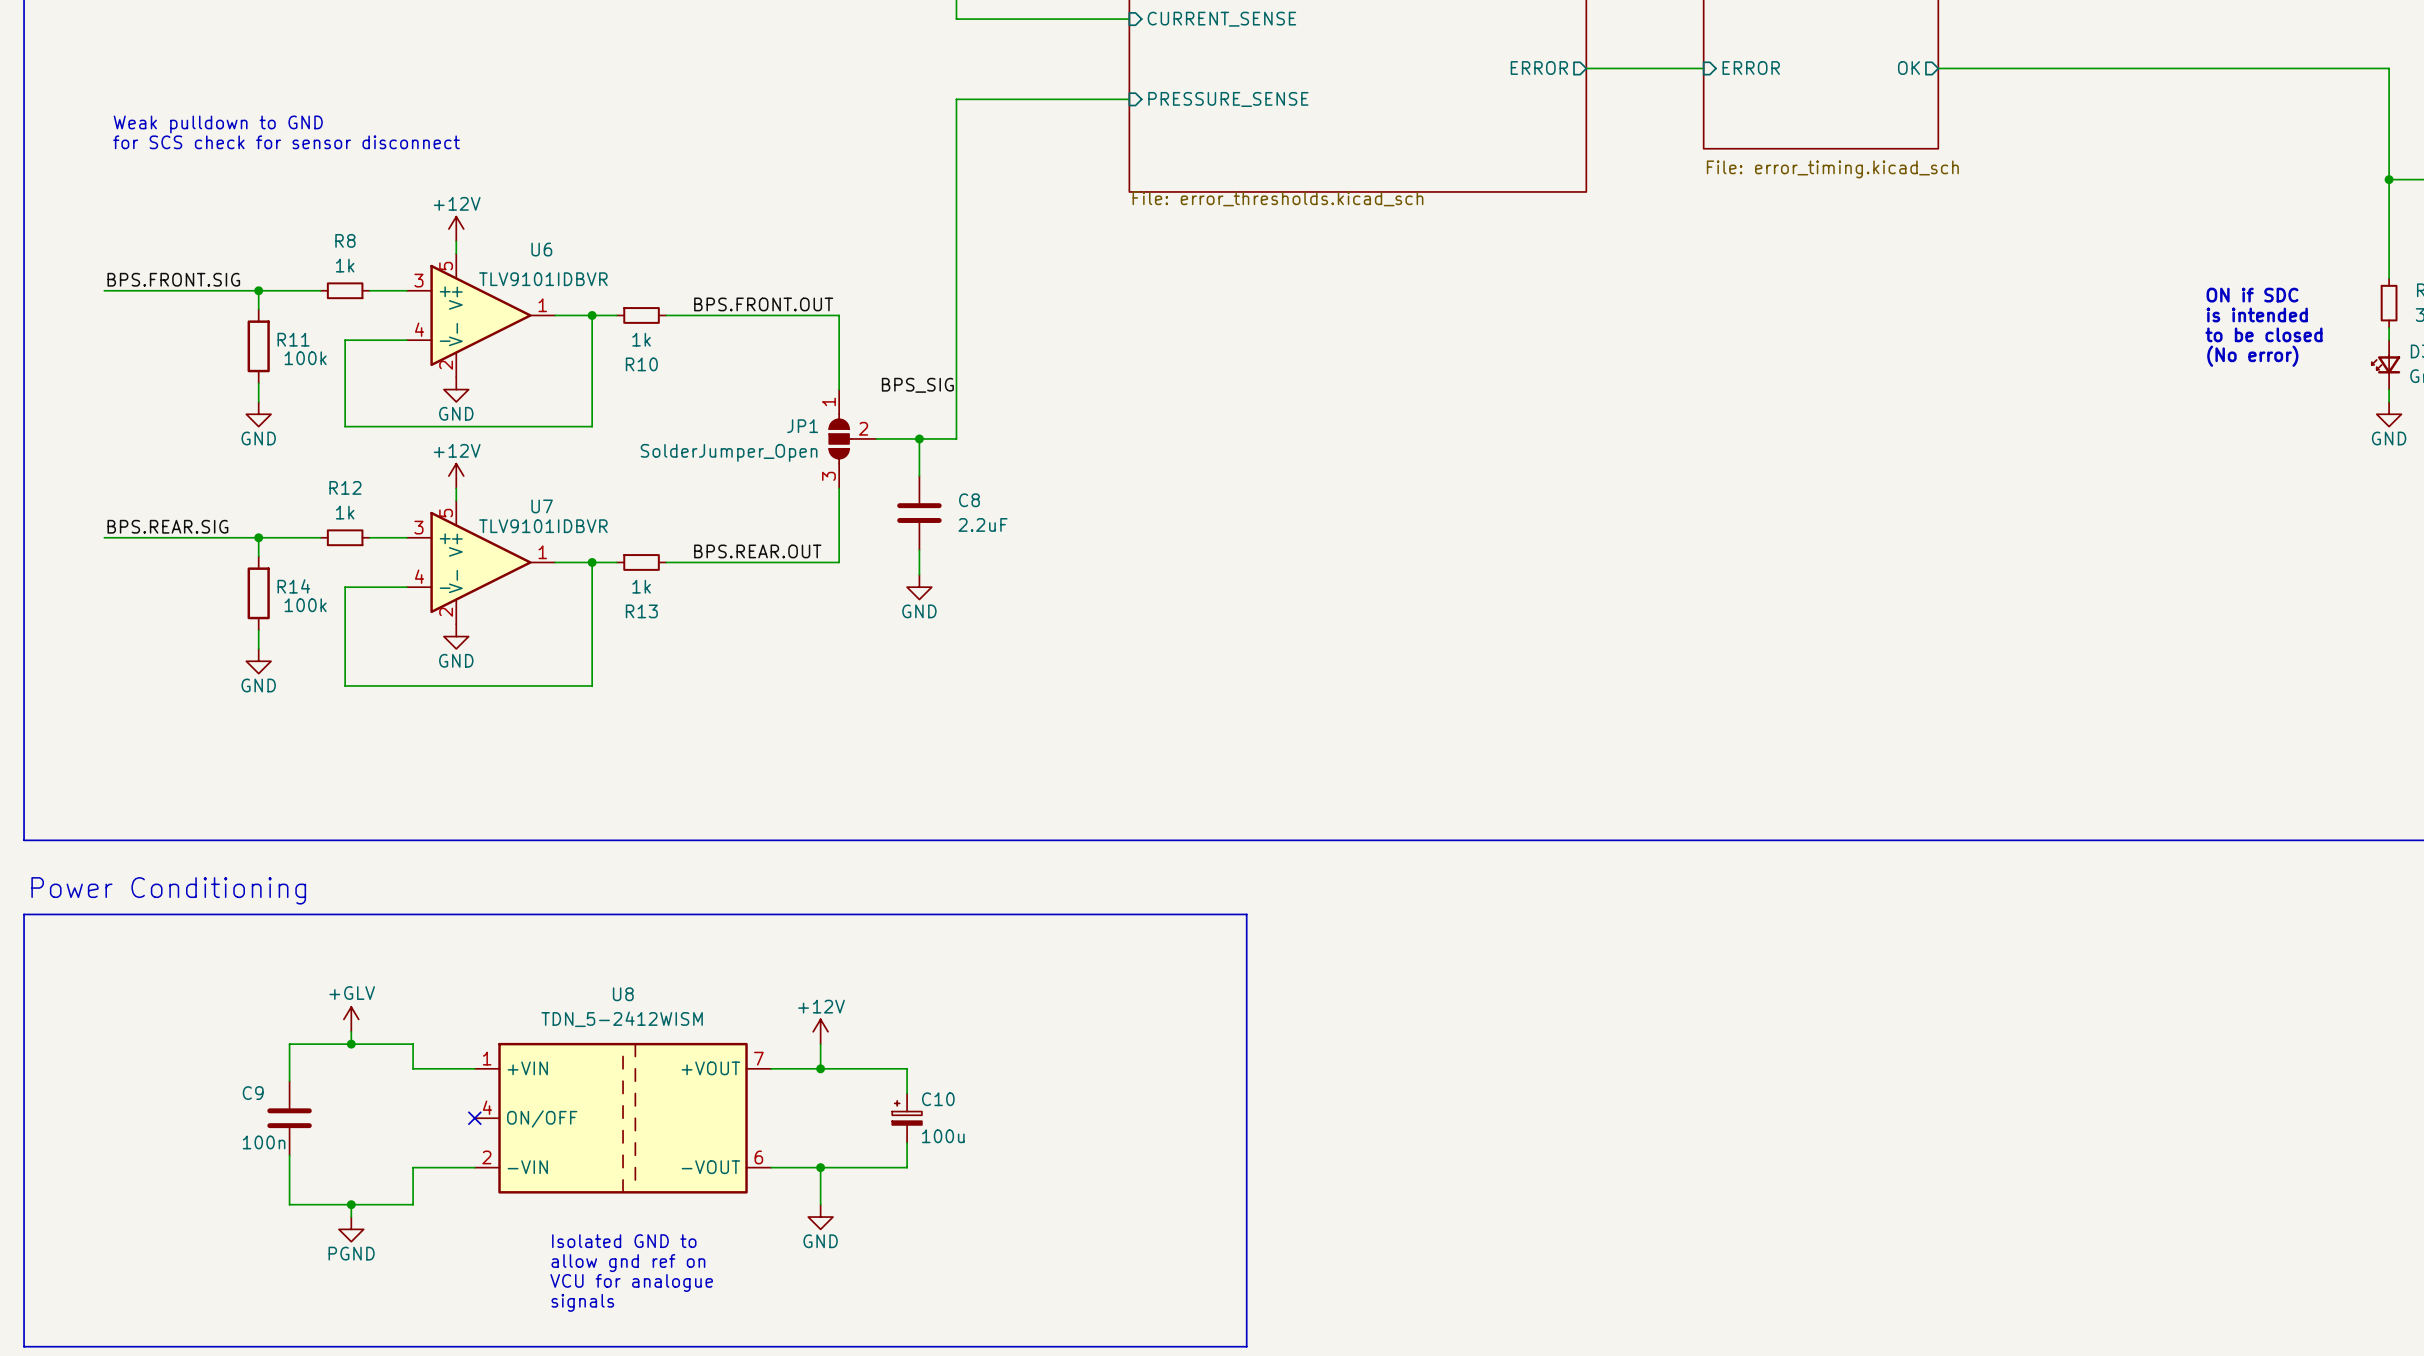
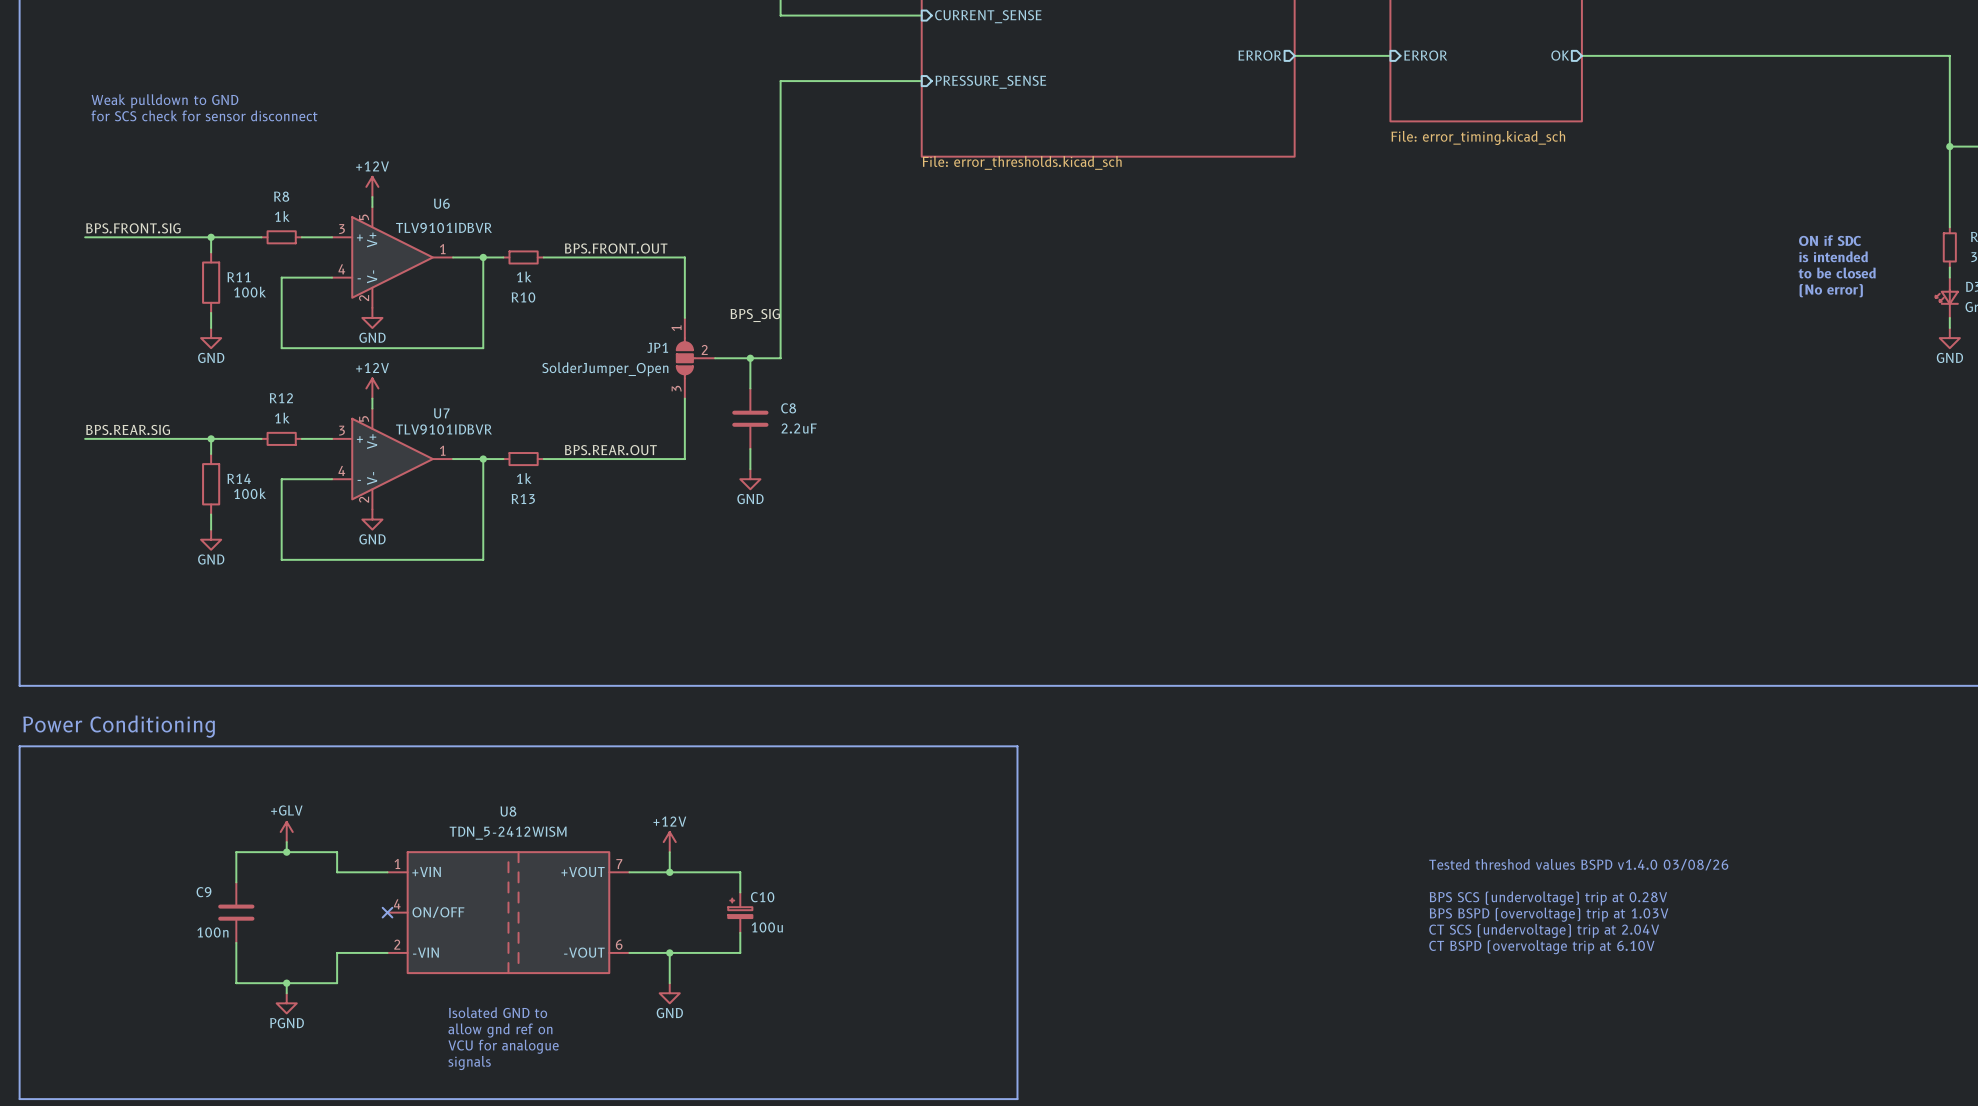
text: none -> Tested threshod values BSPD v1.4.0 03/08/26 (1578, 864)
text: none -> BPS SCS (undervoltage) trip at 0.28V (1548, 898)
text: none -> BPS BSPD (overvoltage) trip at 1.03V (1549, 914)
text: none -> CT SCS (undervoltage) trip at 2.04V (1544, 930)
text: none -> CT BSPD (overvoltage trip at 6.10V (1541, 947)

